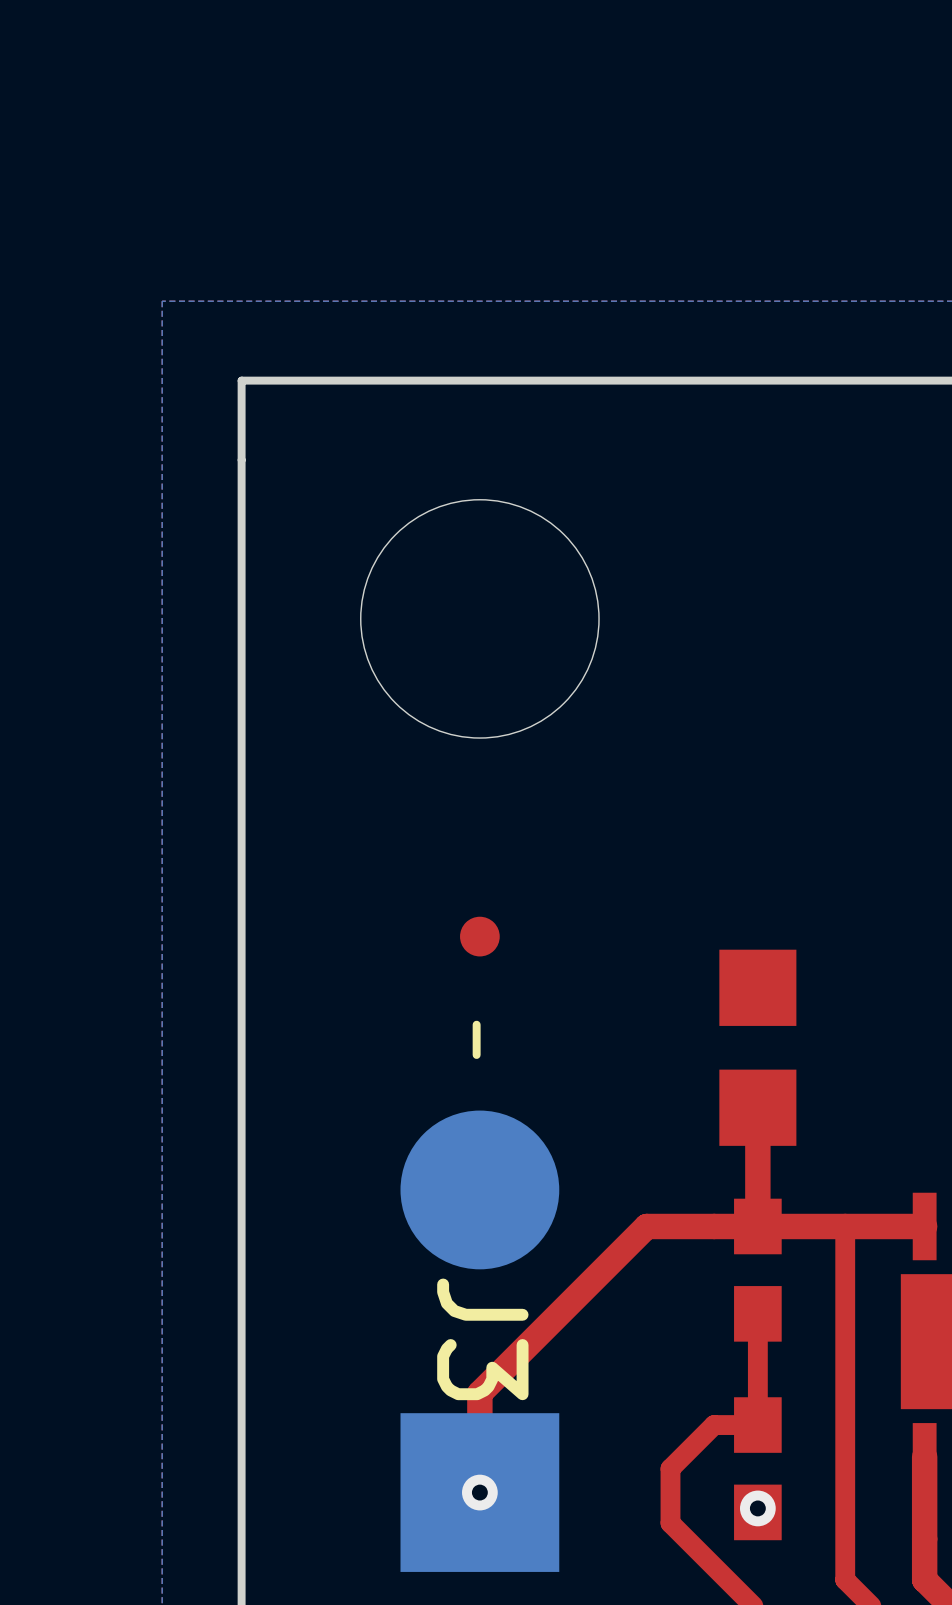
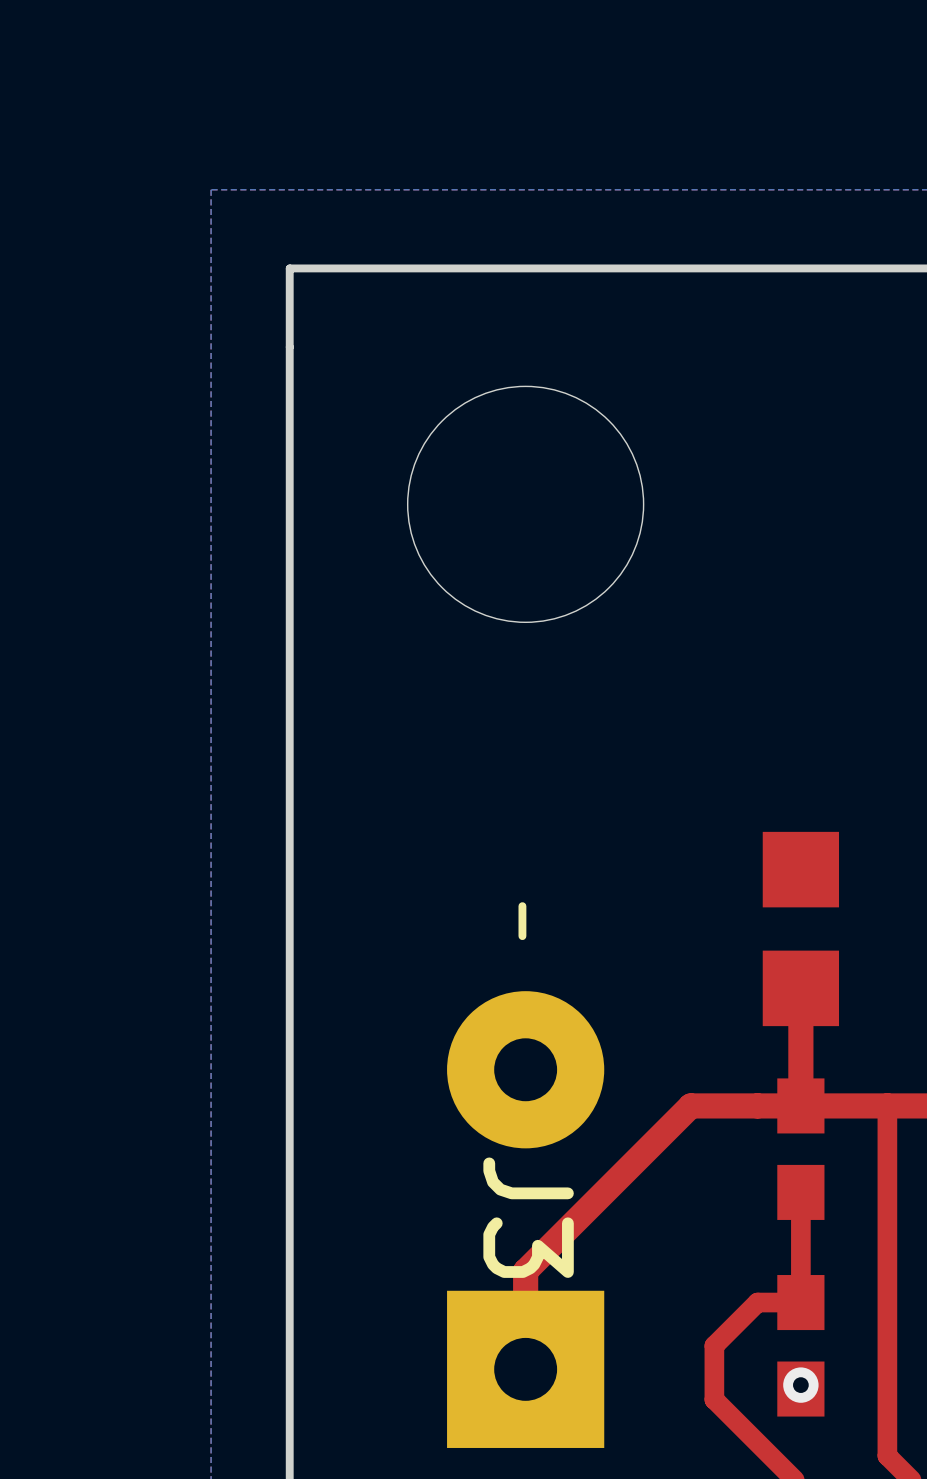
part: (479, 936) -> none
J3 footprint: [400, 1110, 560, 1572] -> [447, 991, 605, 1448]
via: (479, 1492) -> none

